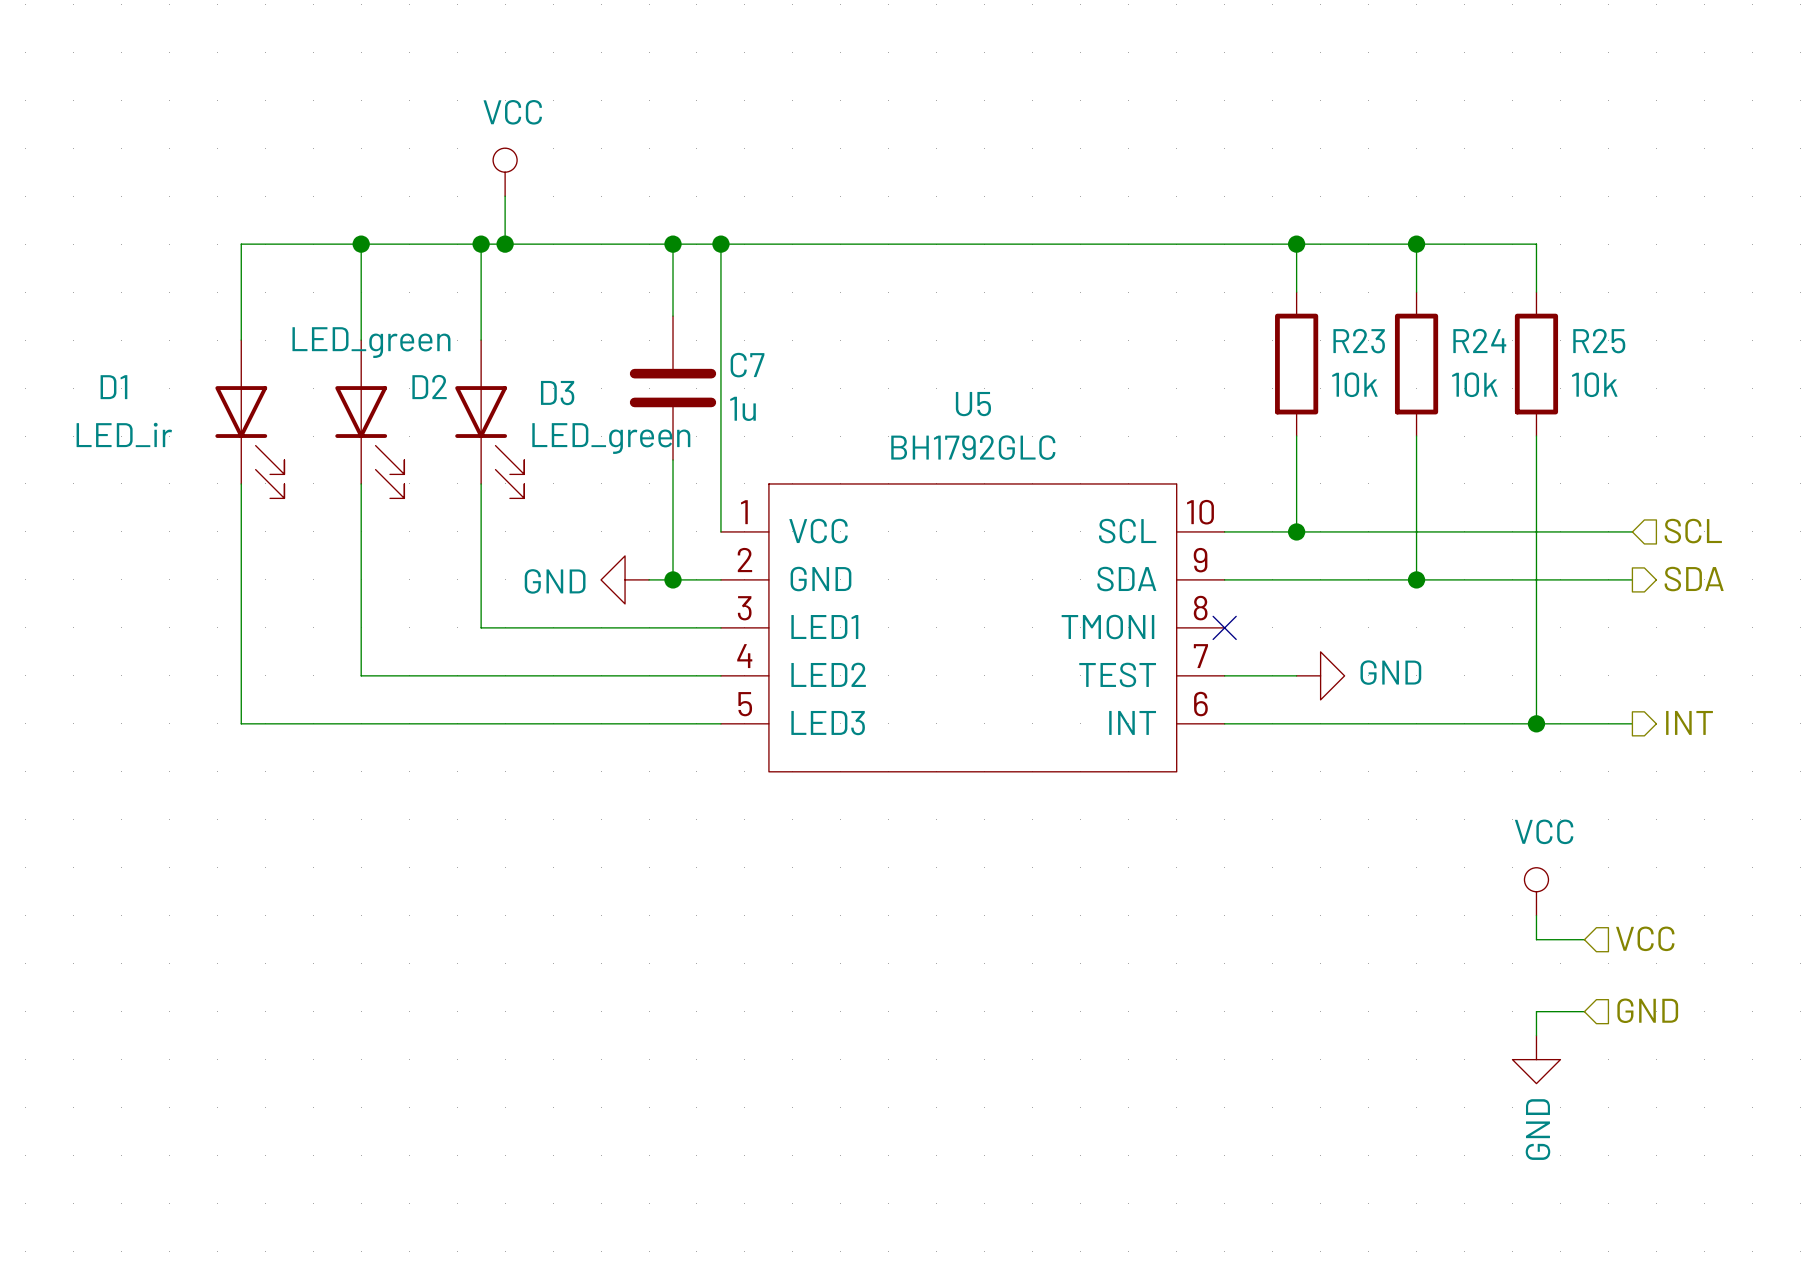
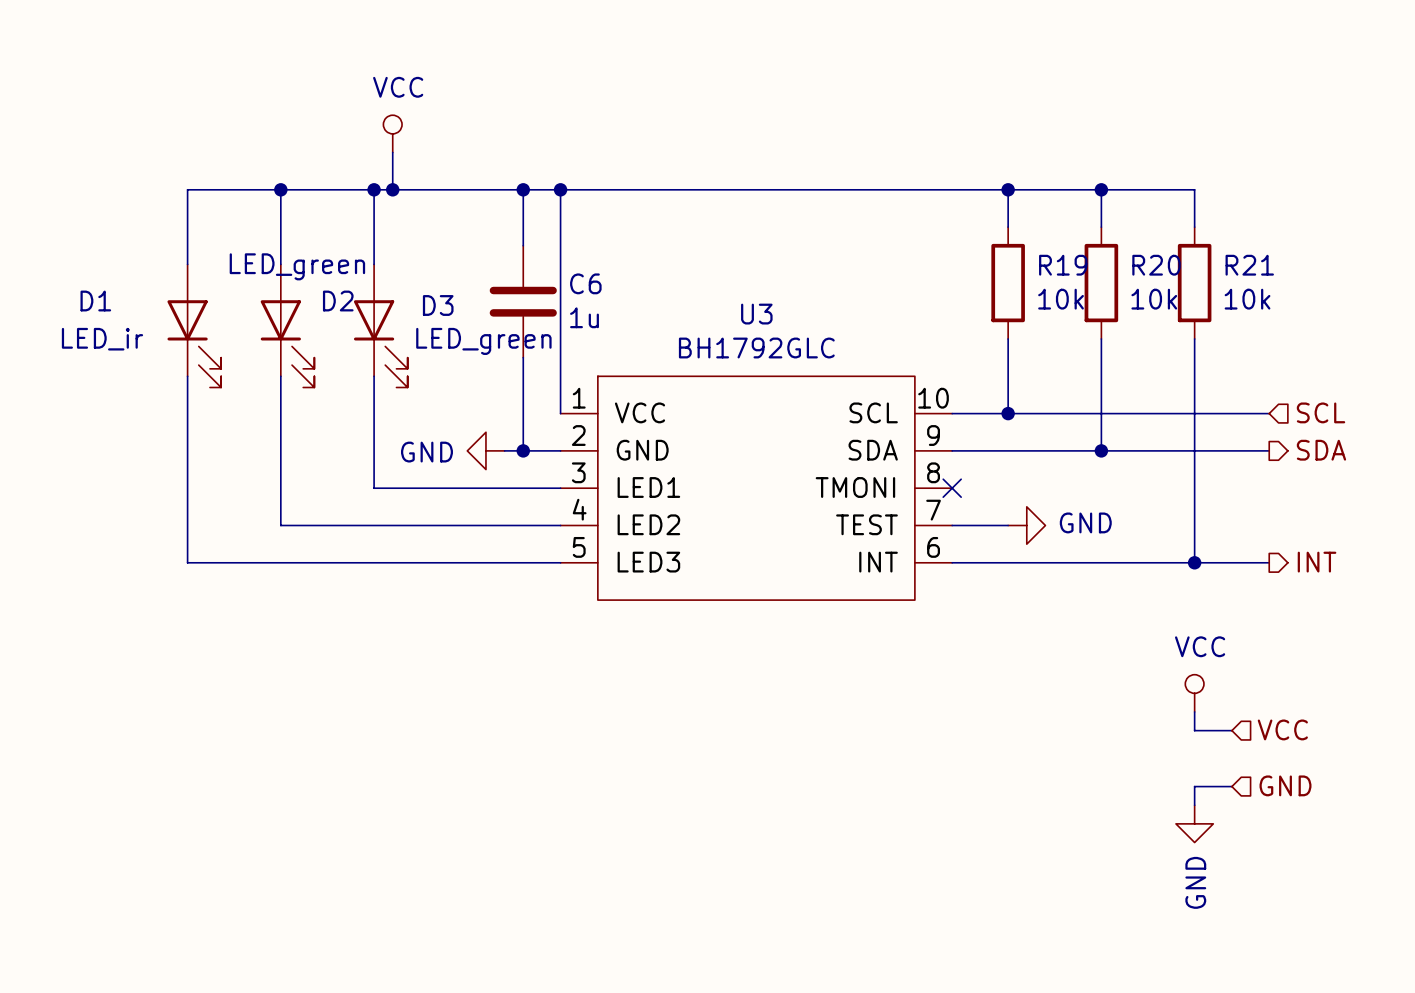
R24 name: R24 (1479, 340) -> R20 (1156, 265)
R23 name: R23 (1359, 341) -> R19 (1063, 265)
R25 name: R25 (1599, 341) -> R21 (1249, 265)
C7 name: C7 (747, 365) -> C6 (585, 283)
U5 name: U5 (973, 404) -> U3 (756, 314)

